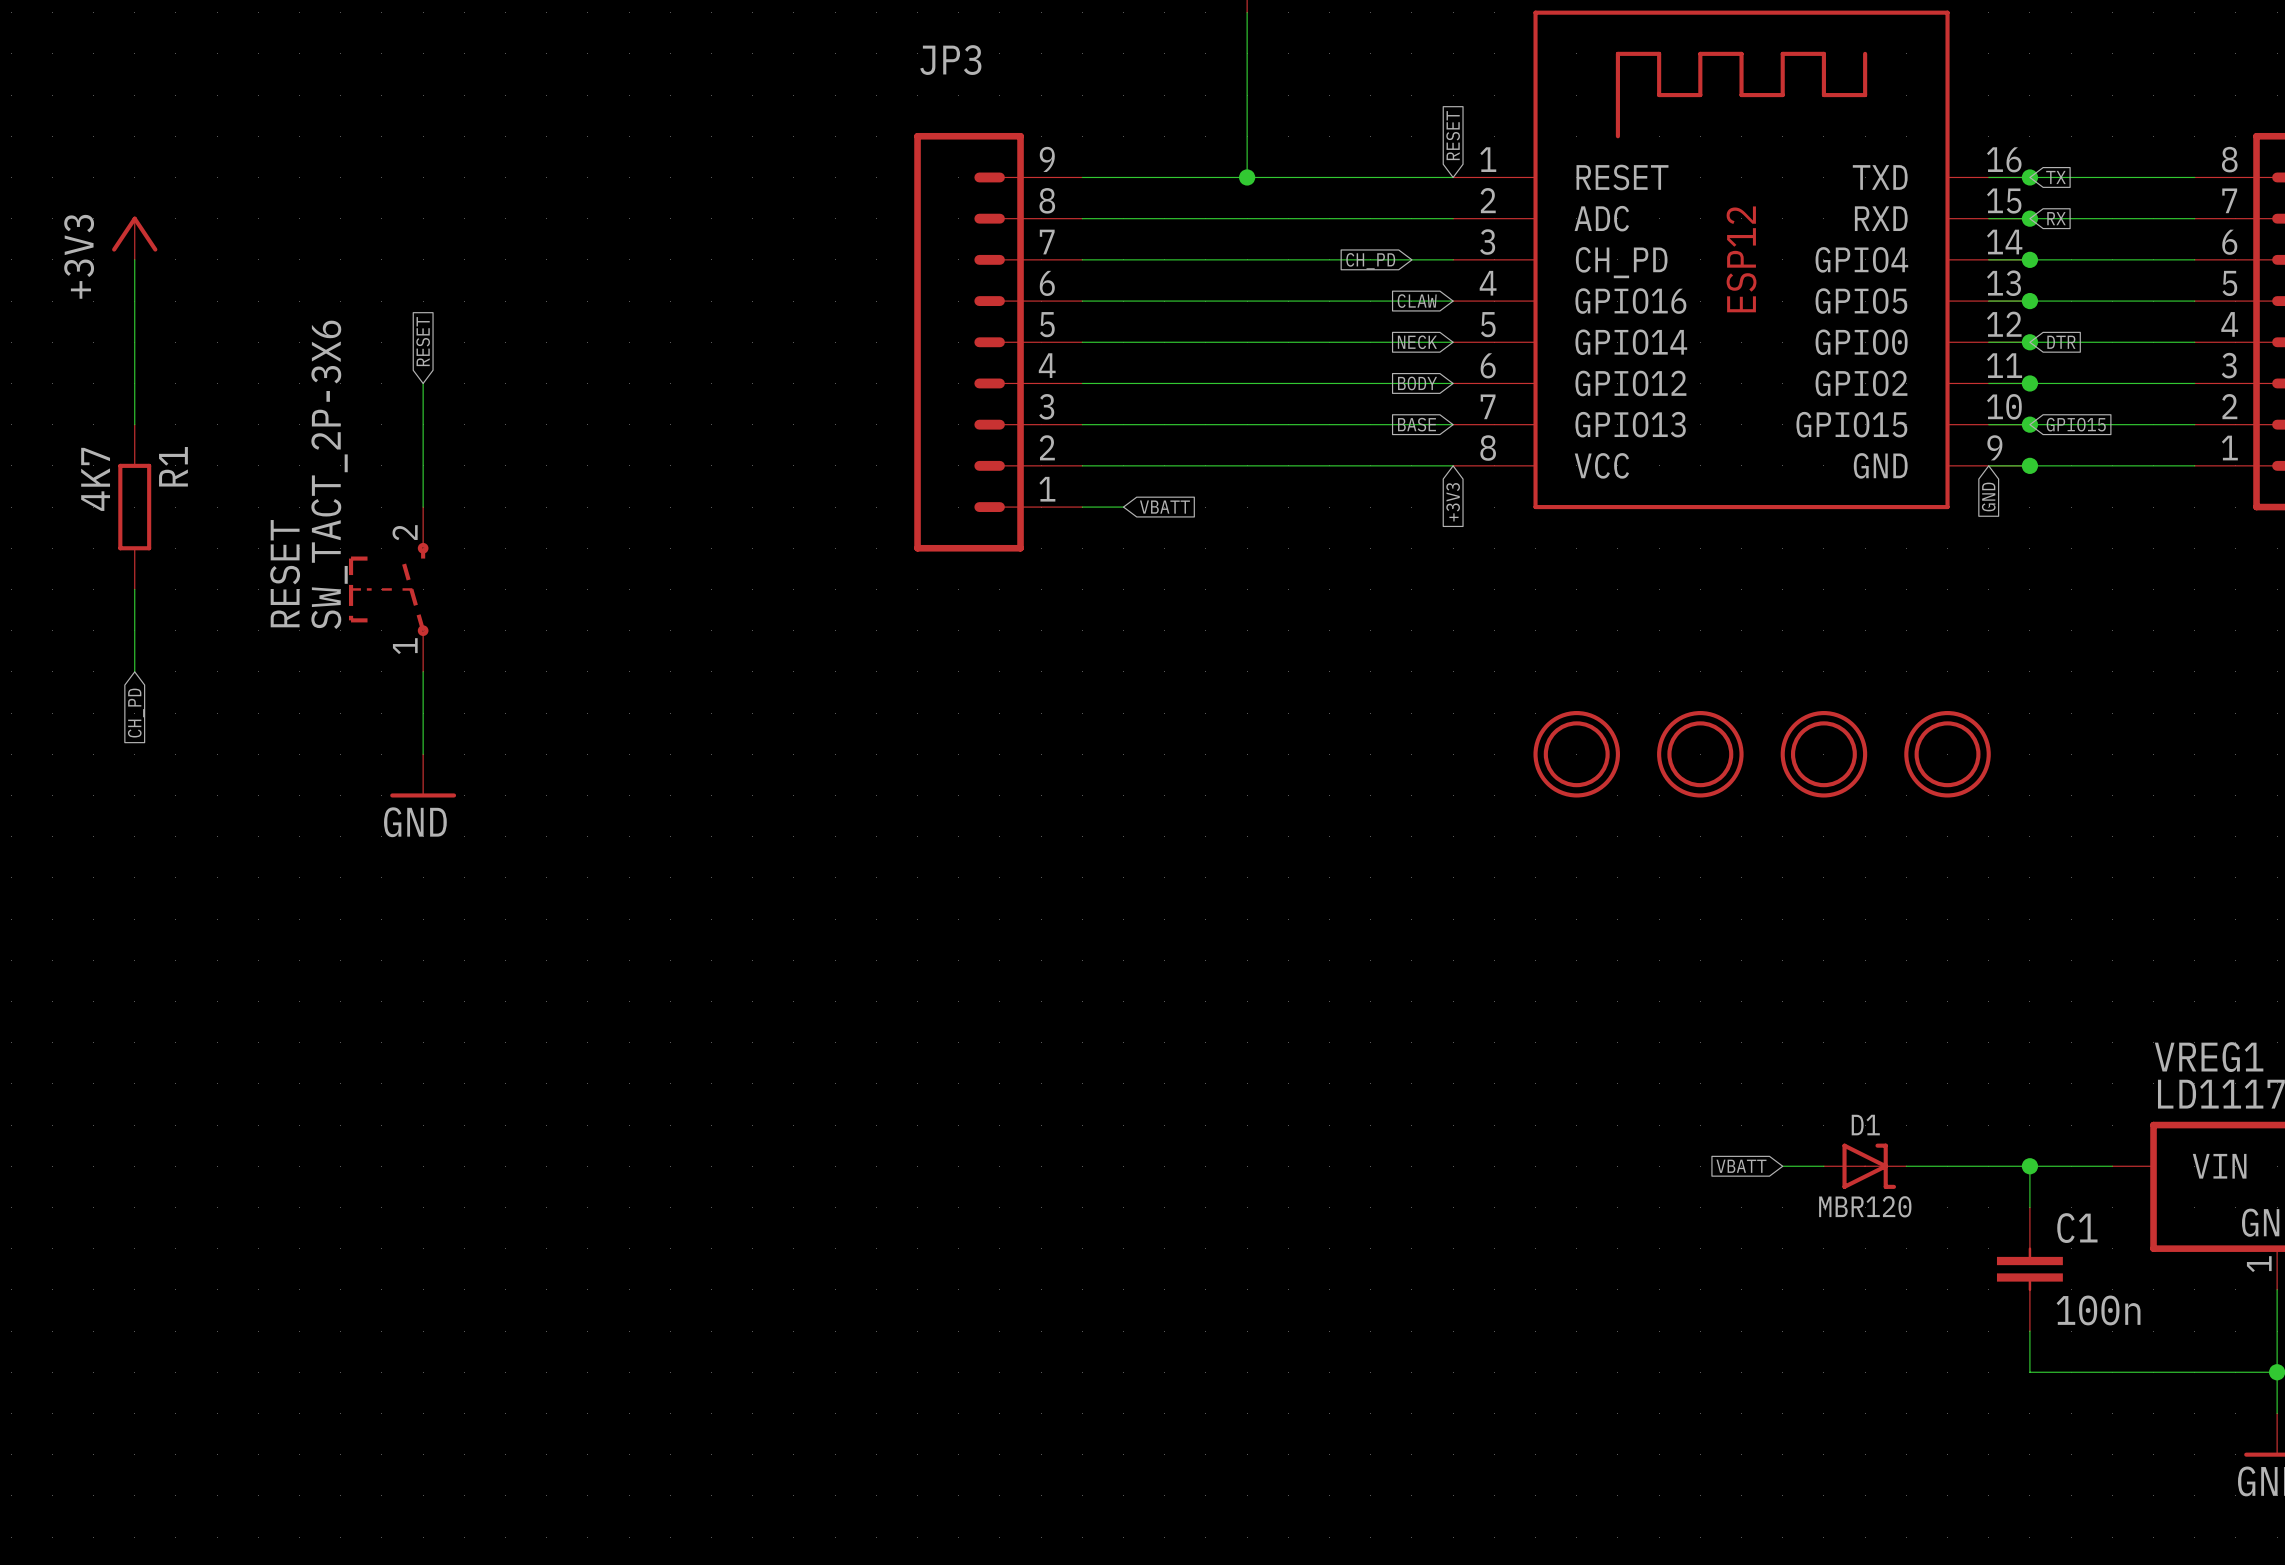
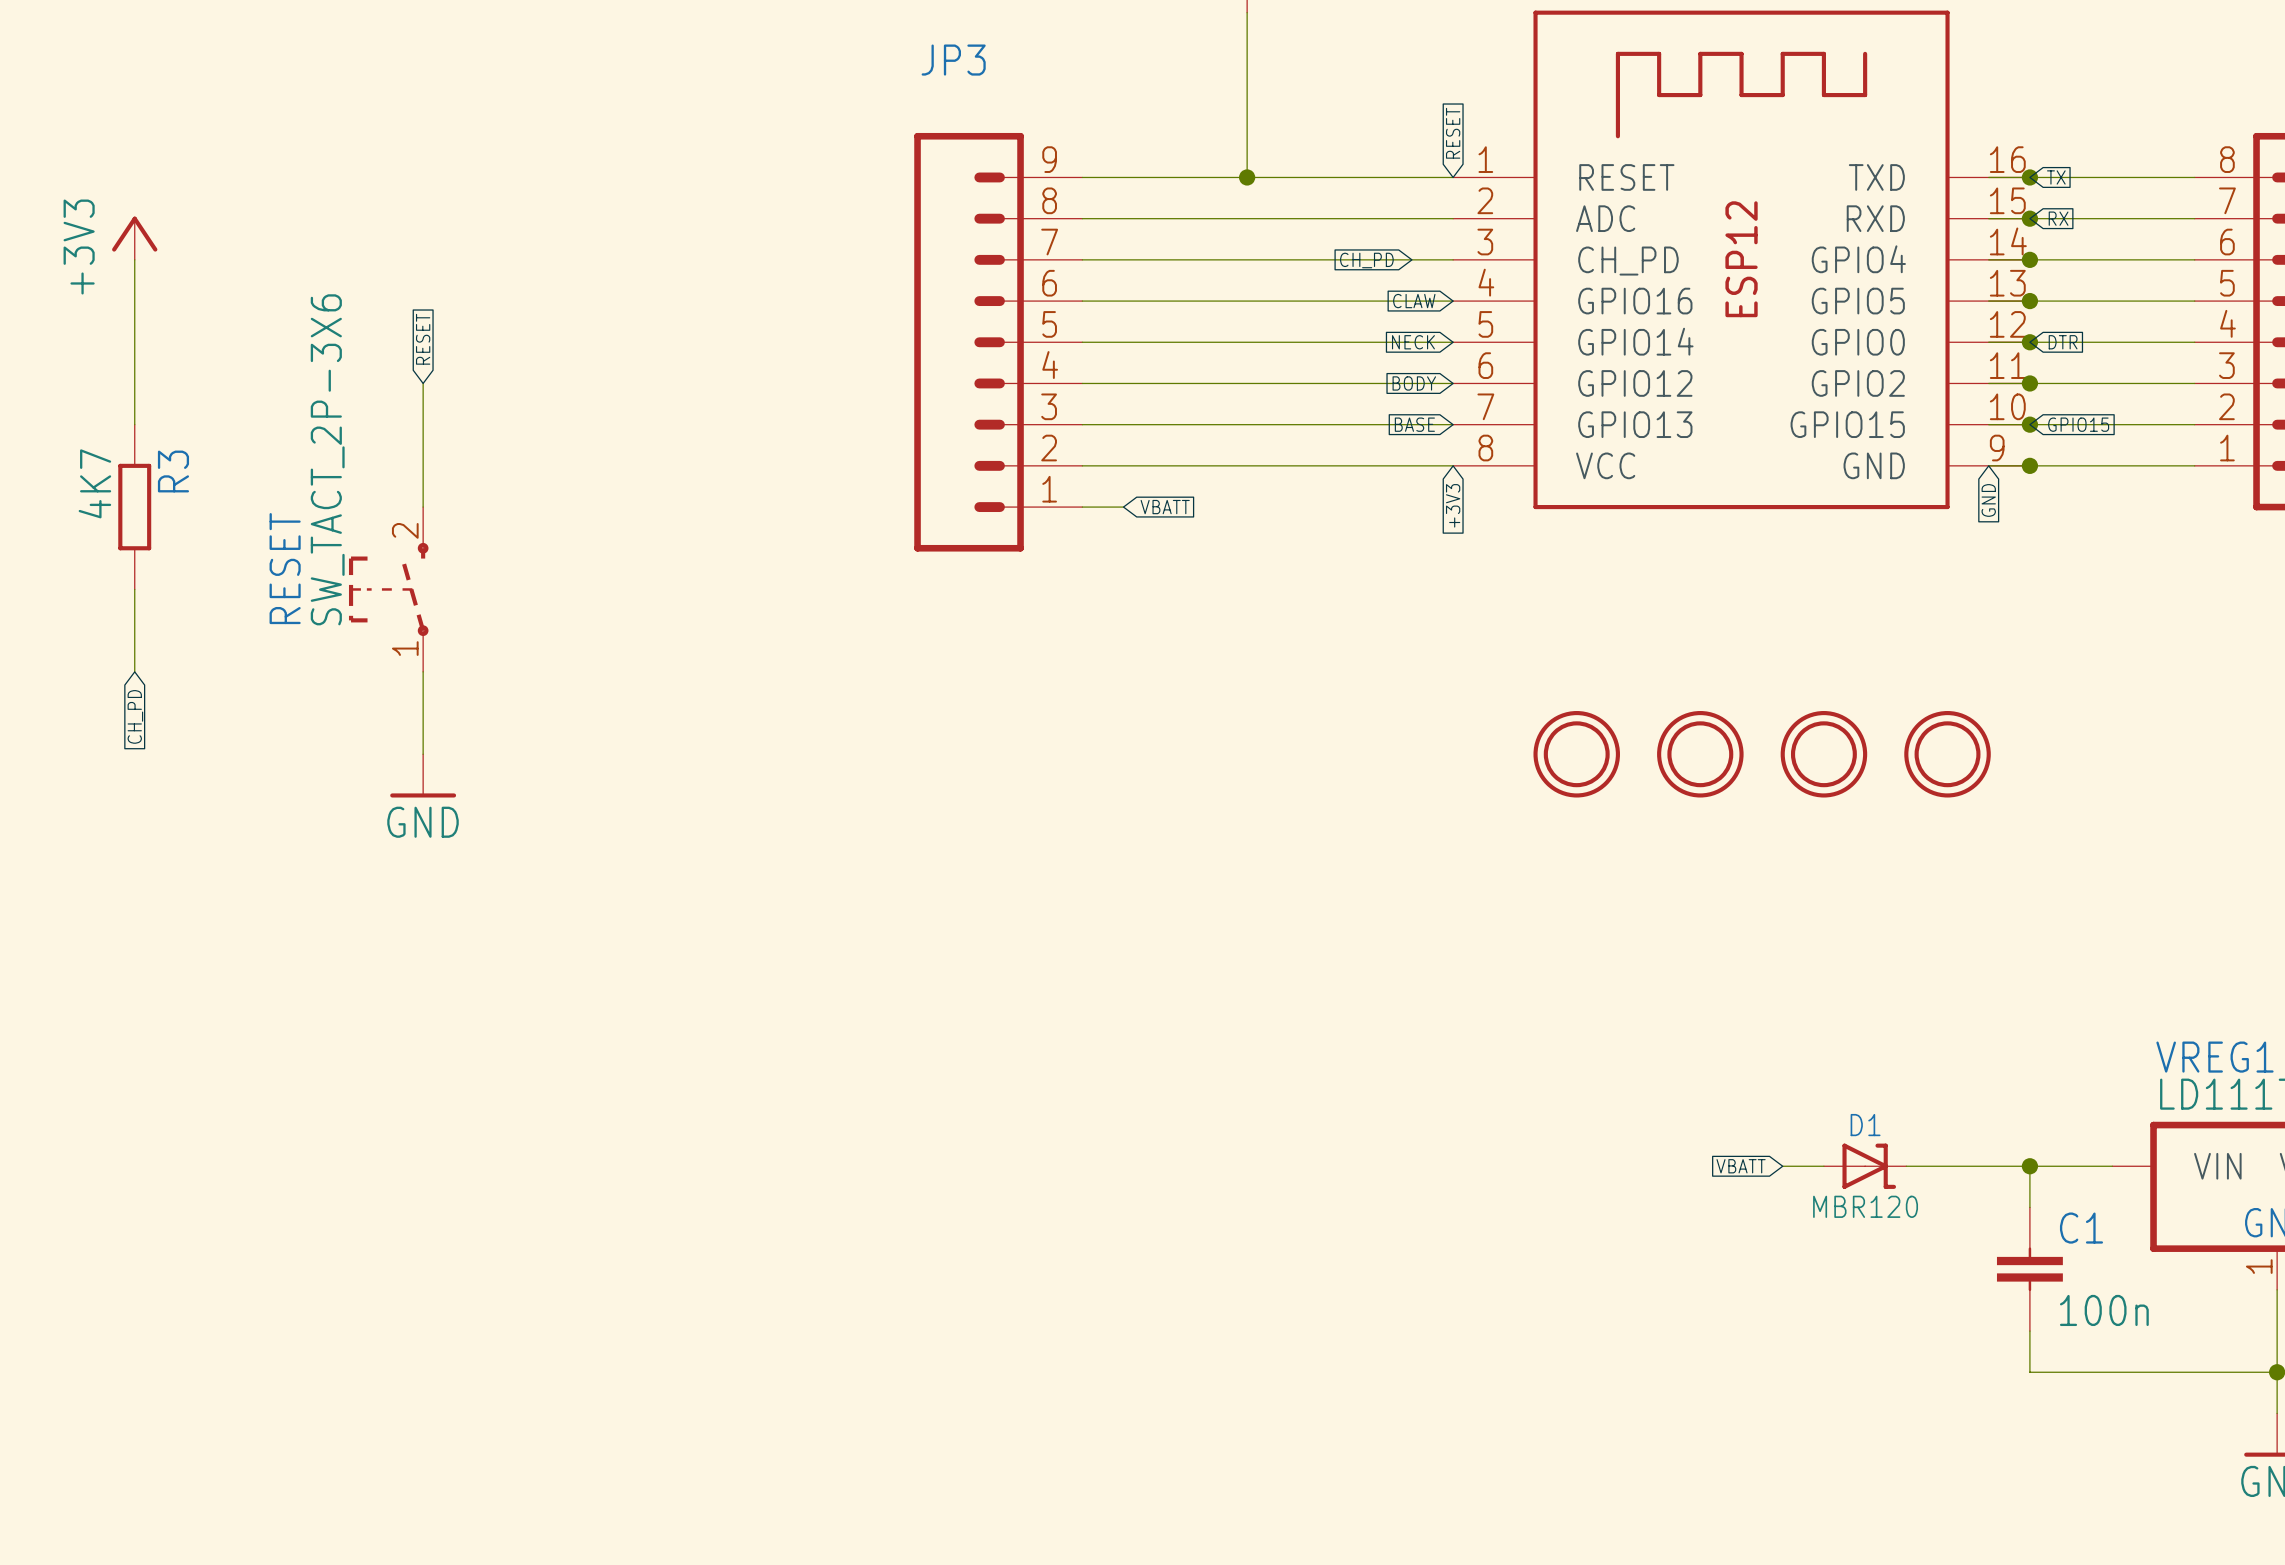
R1 name: R1 (173, 466) -> R3 (173, 471)

